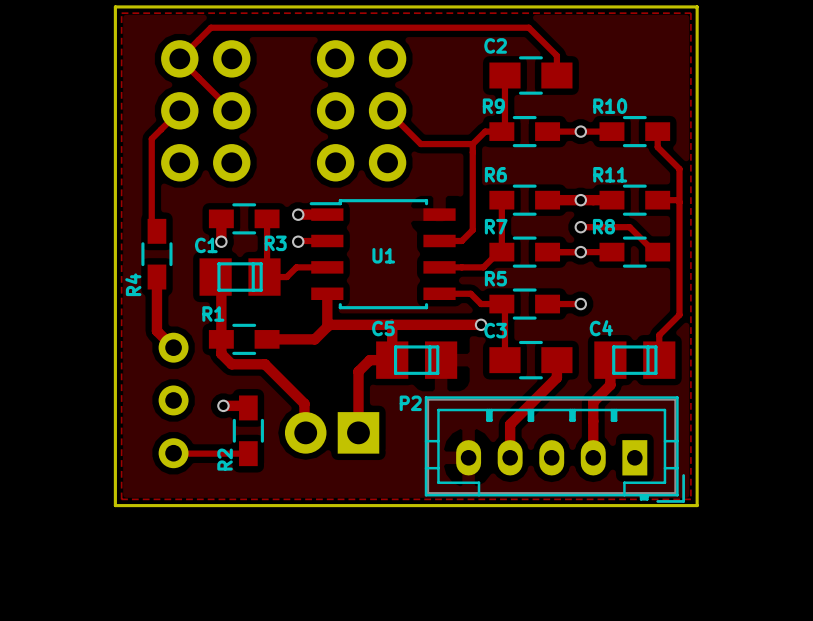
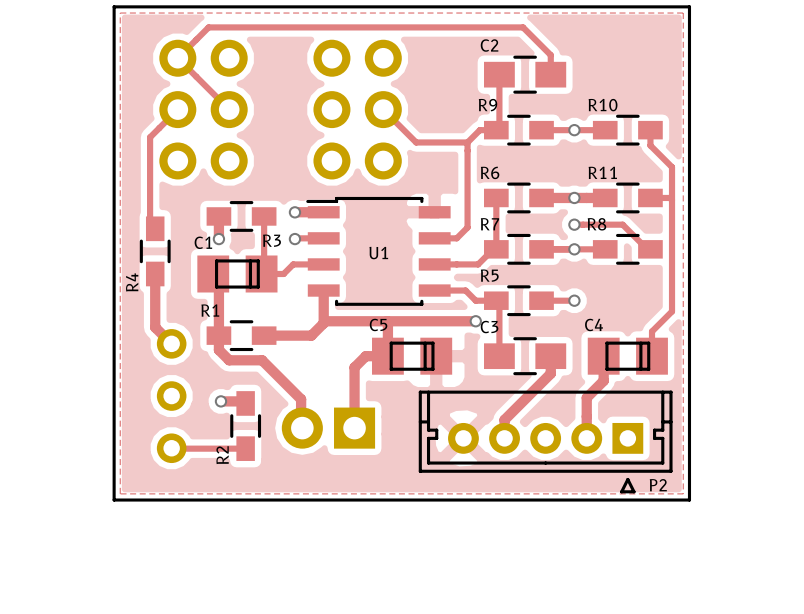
P2 footprint: [424, 396, 685, 503] -> [418, 390, 673, 494]
P2 name position: P2 (410, 403) -> P2 (658, 485)

